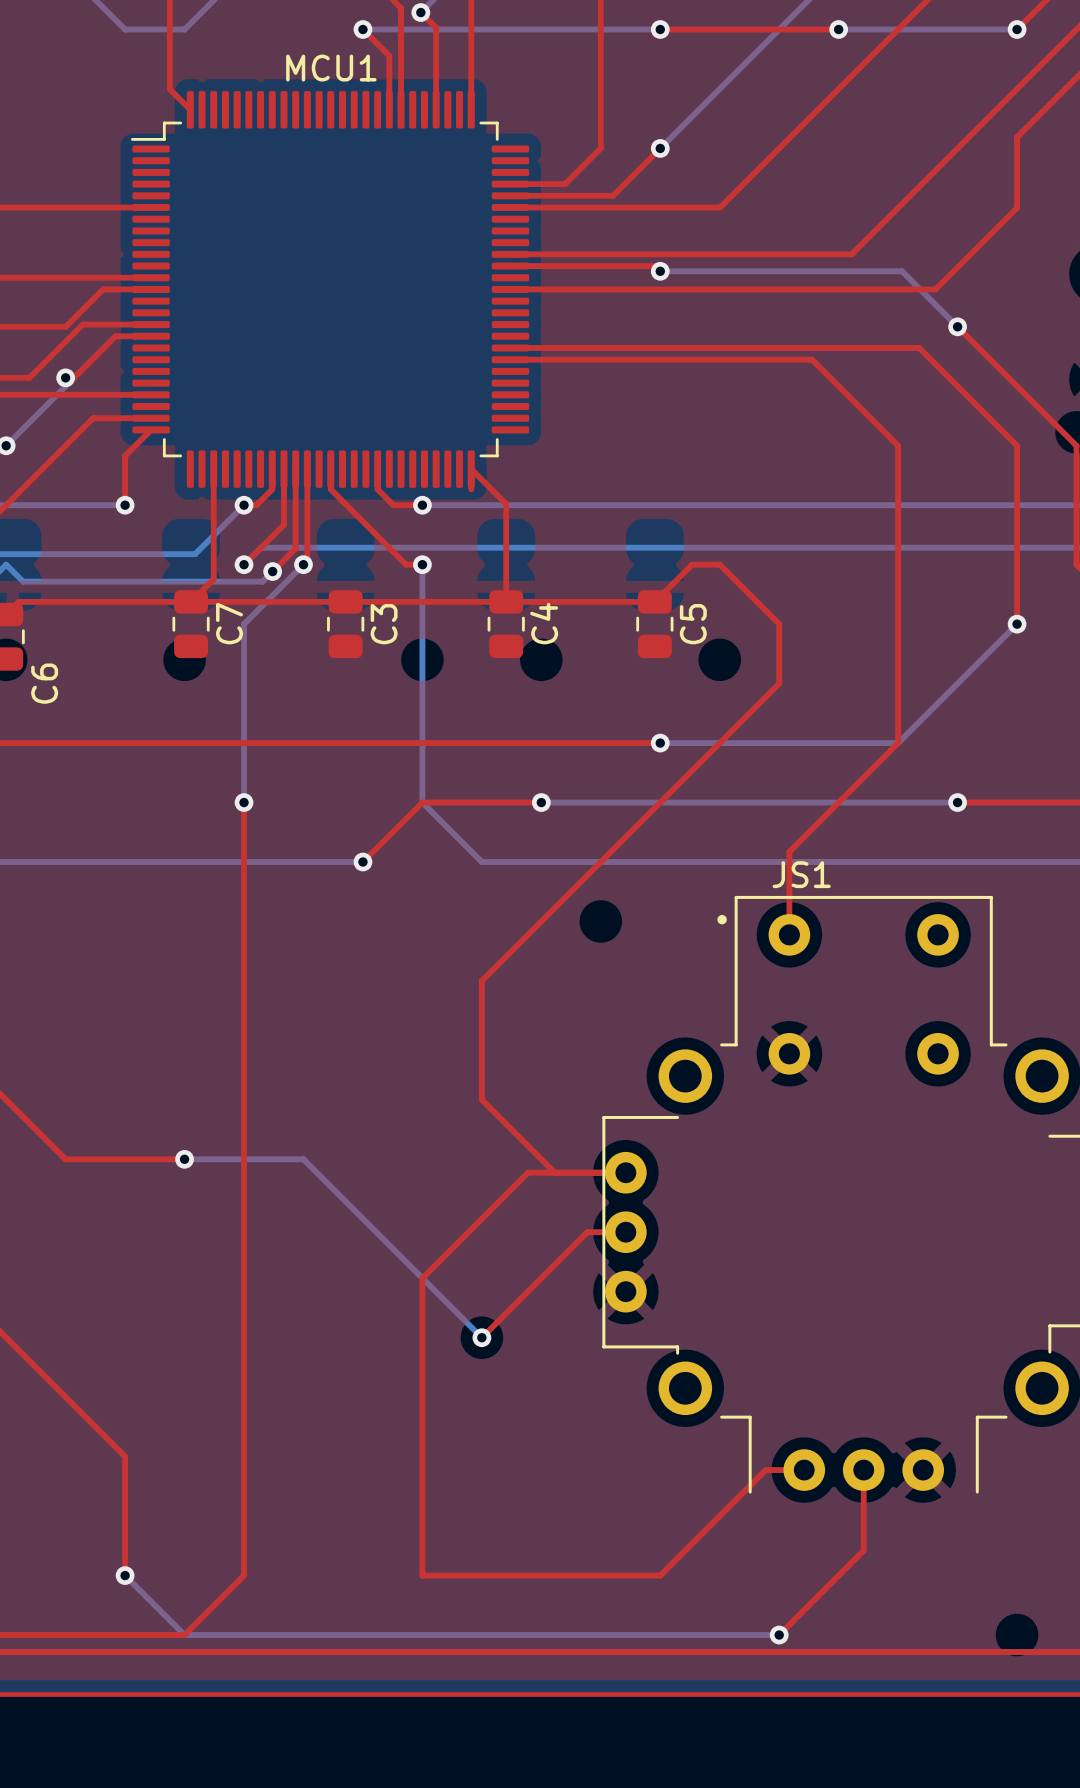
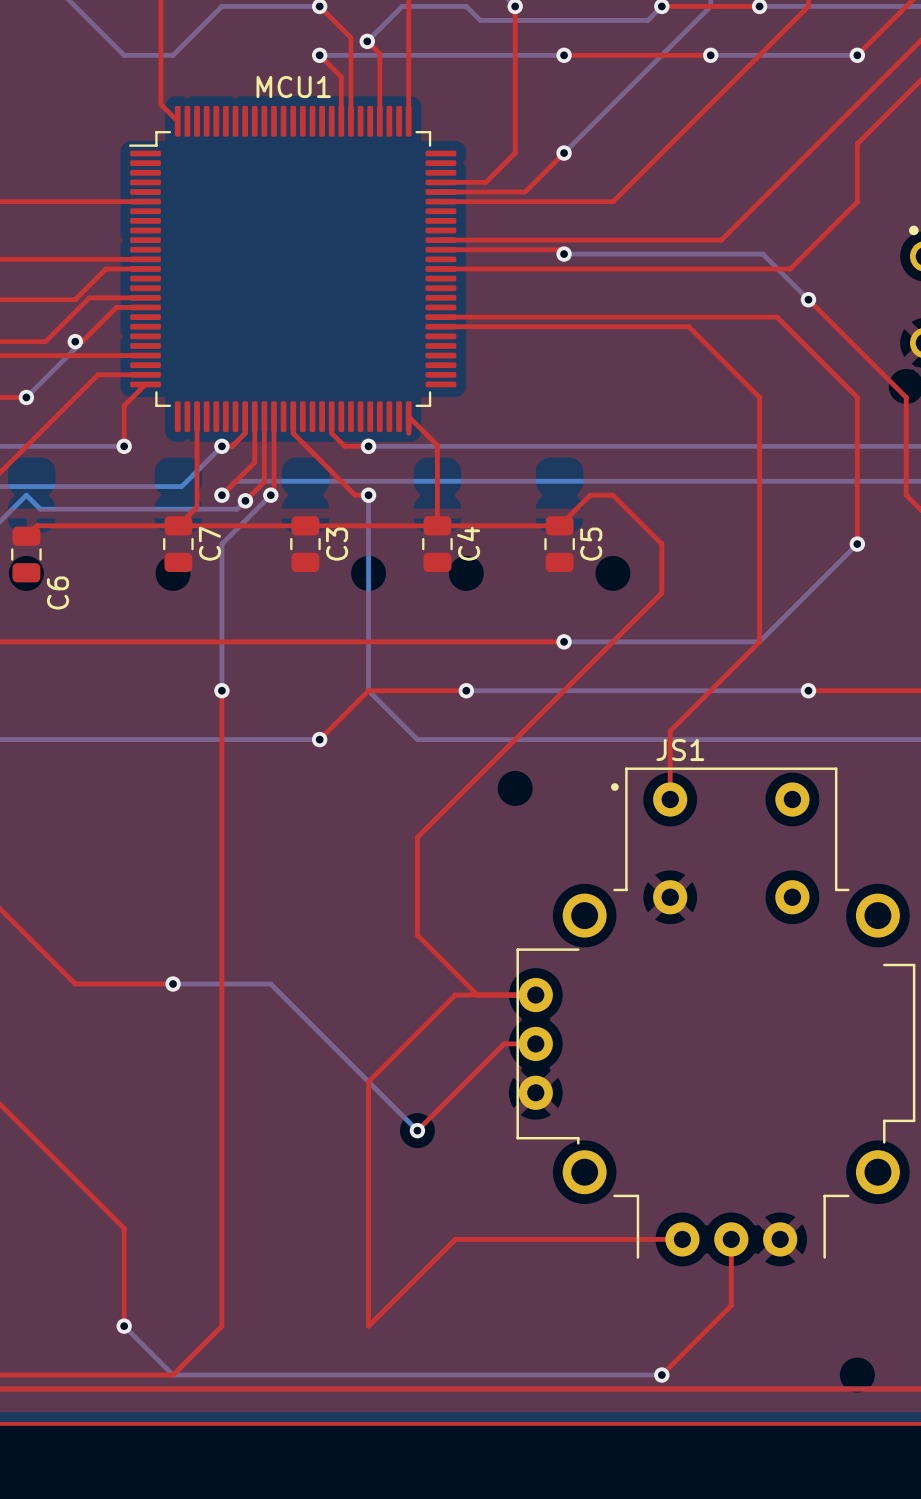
top track: (765, 1470) (660, 1575) (422, 1575) -> (650, 1239) (455, 1239) (368, 1326)

